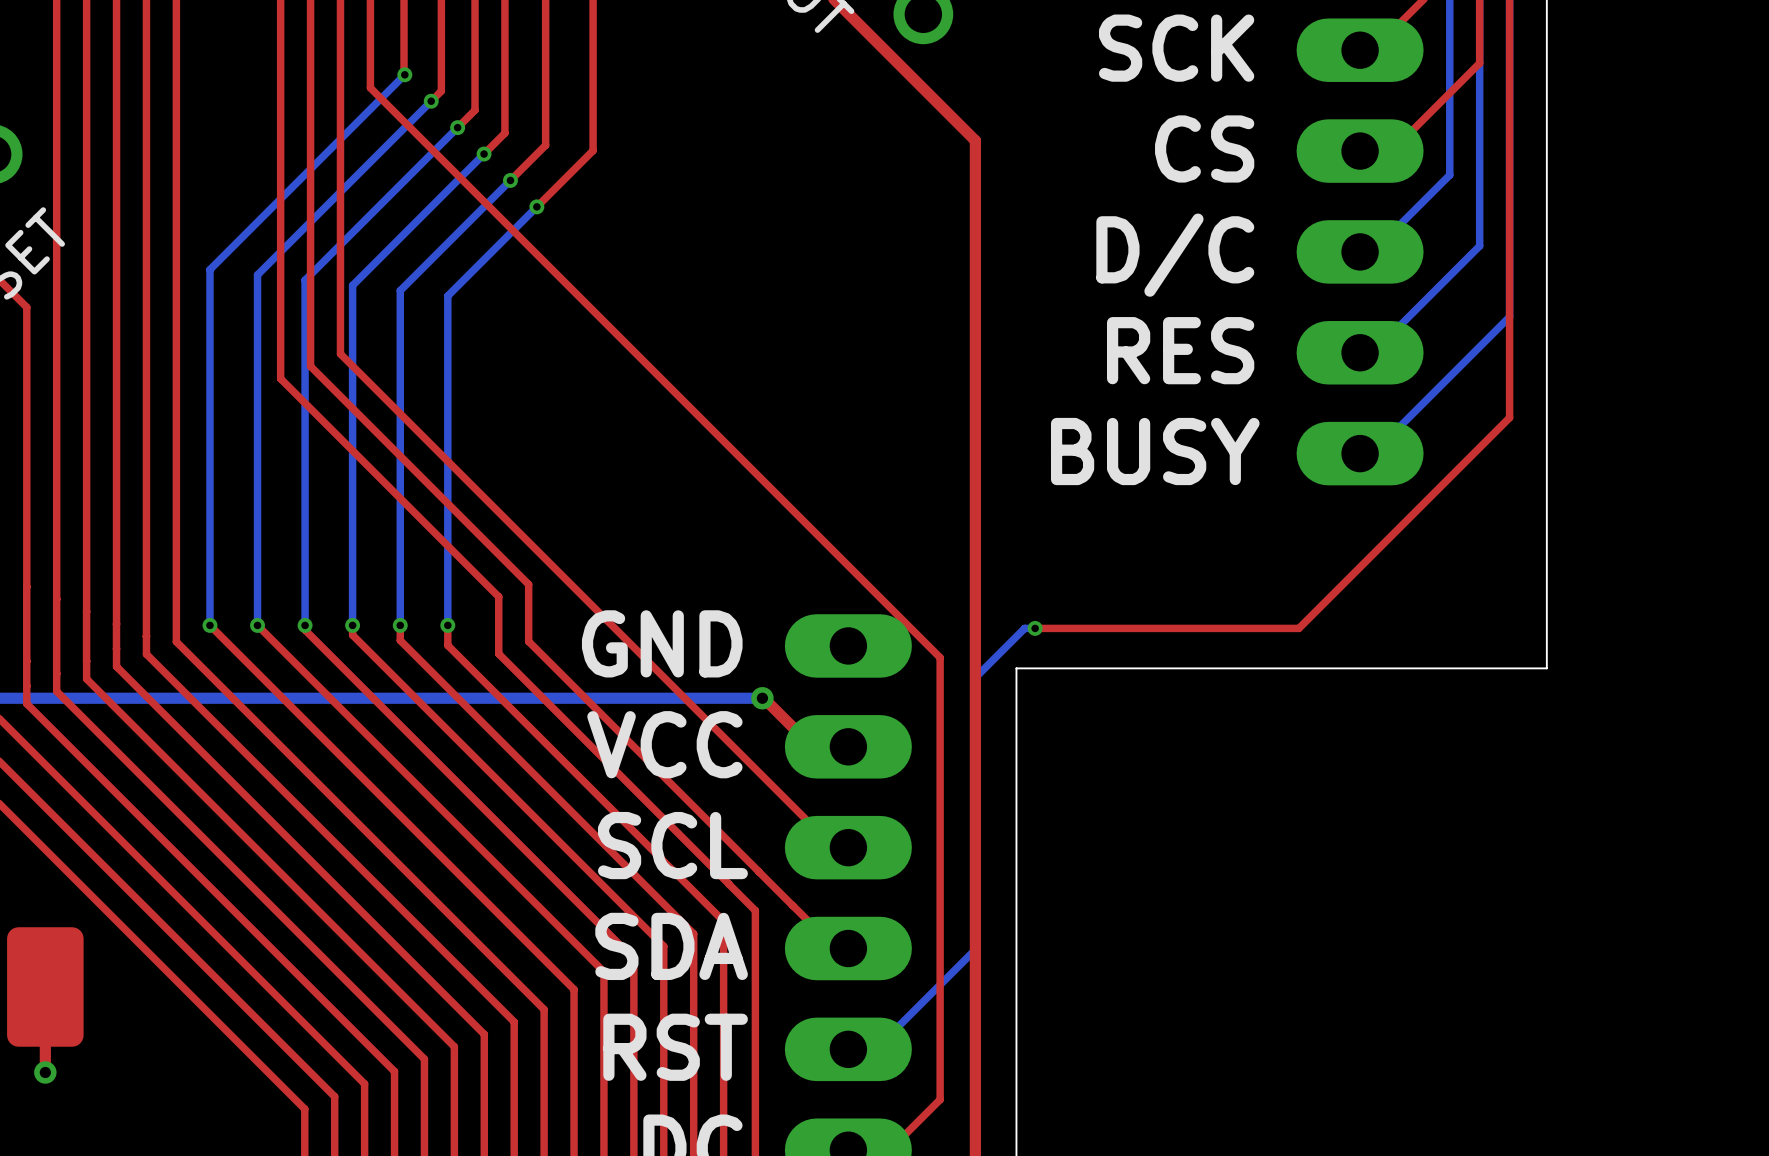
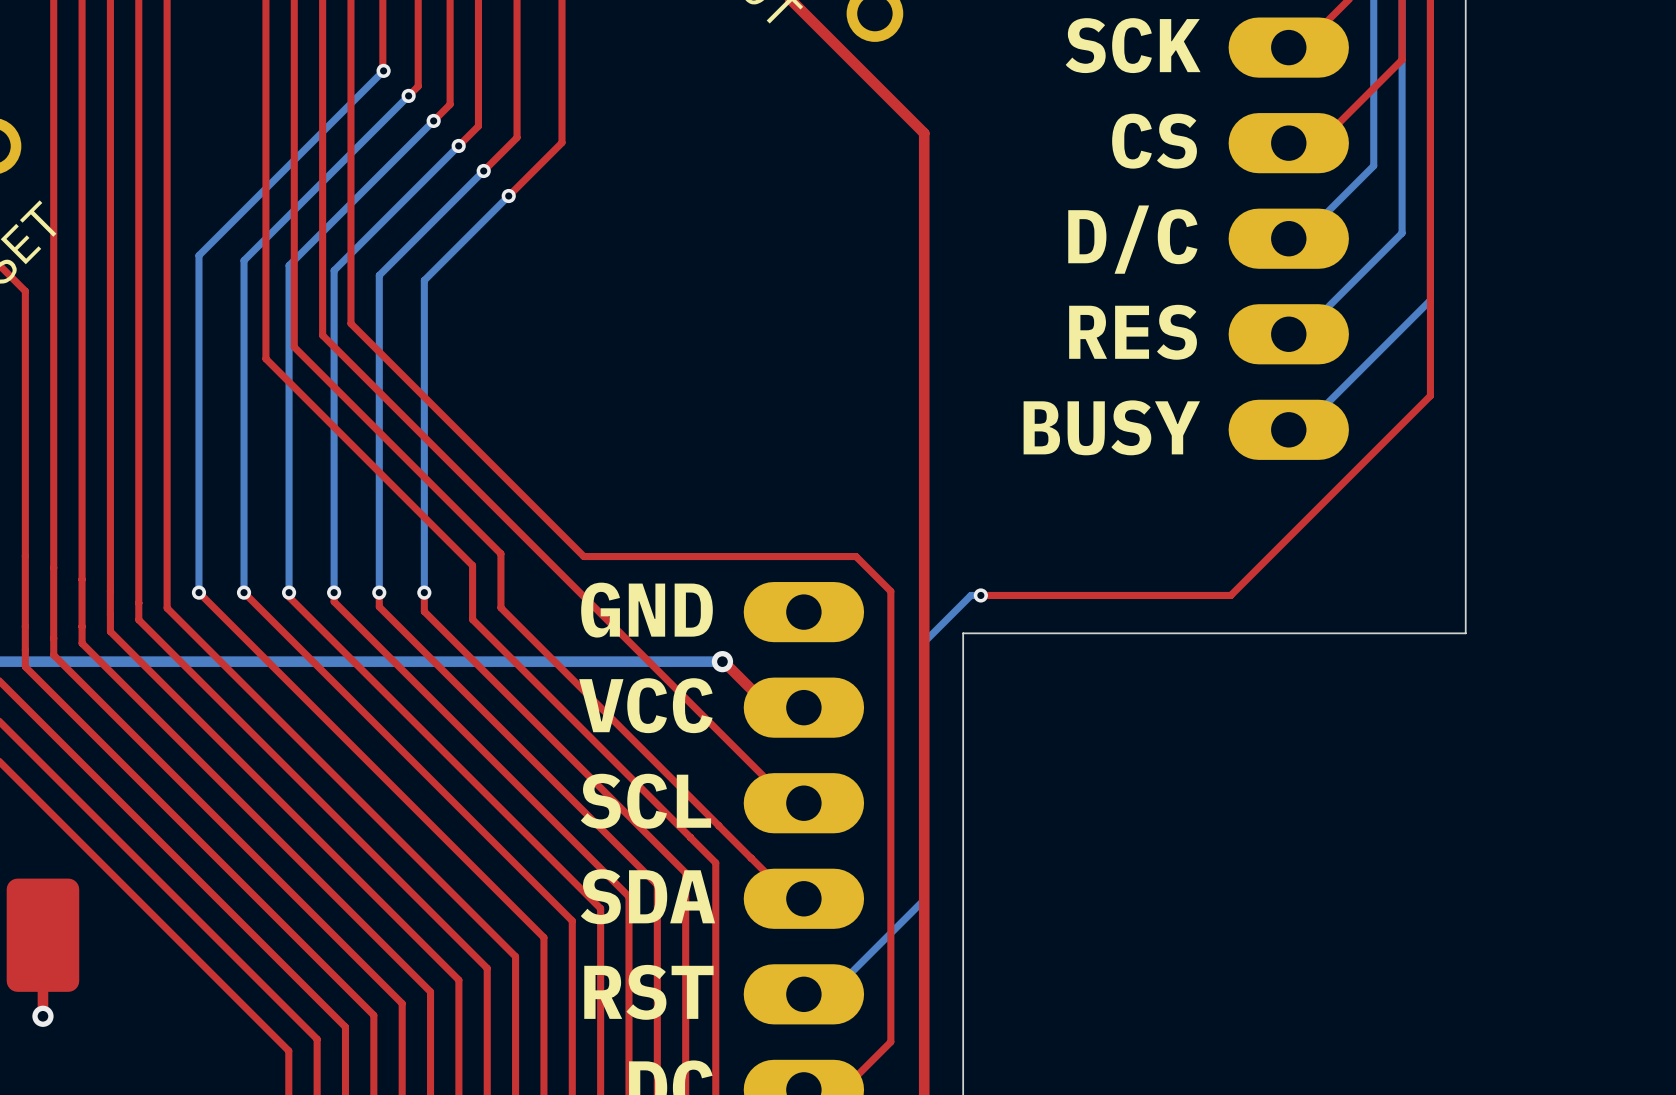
top track: (370, 87) (940, 657) -> (350, 83) (350, 323) (583, 556) (856, 556) (890, 591) (890, 623)

